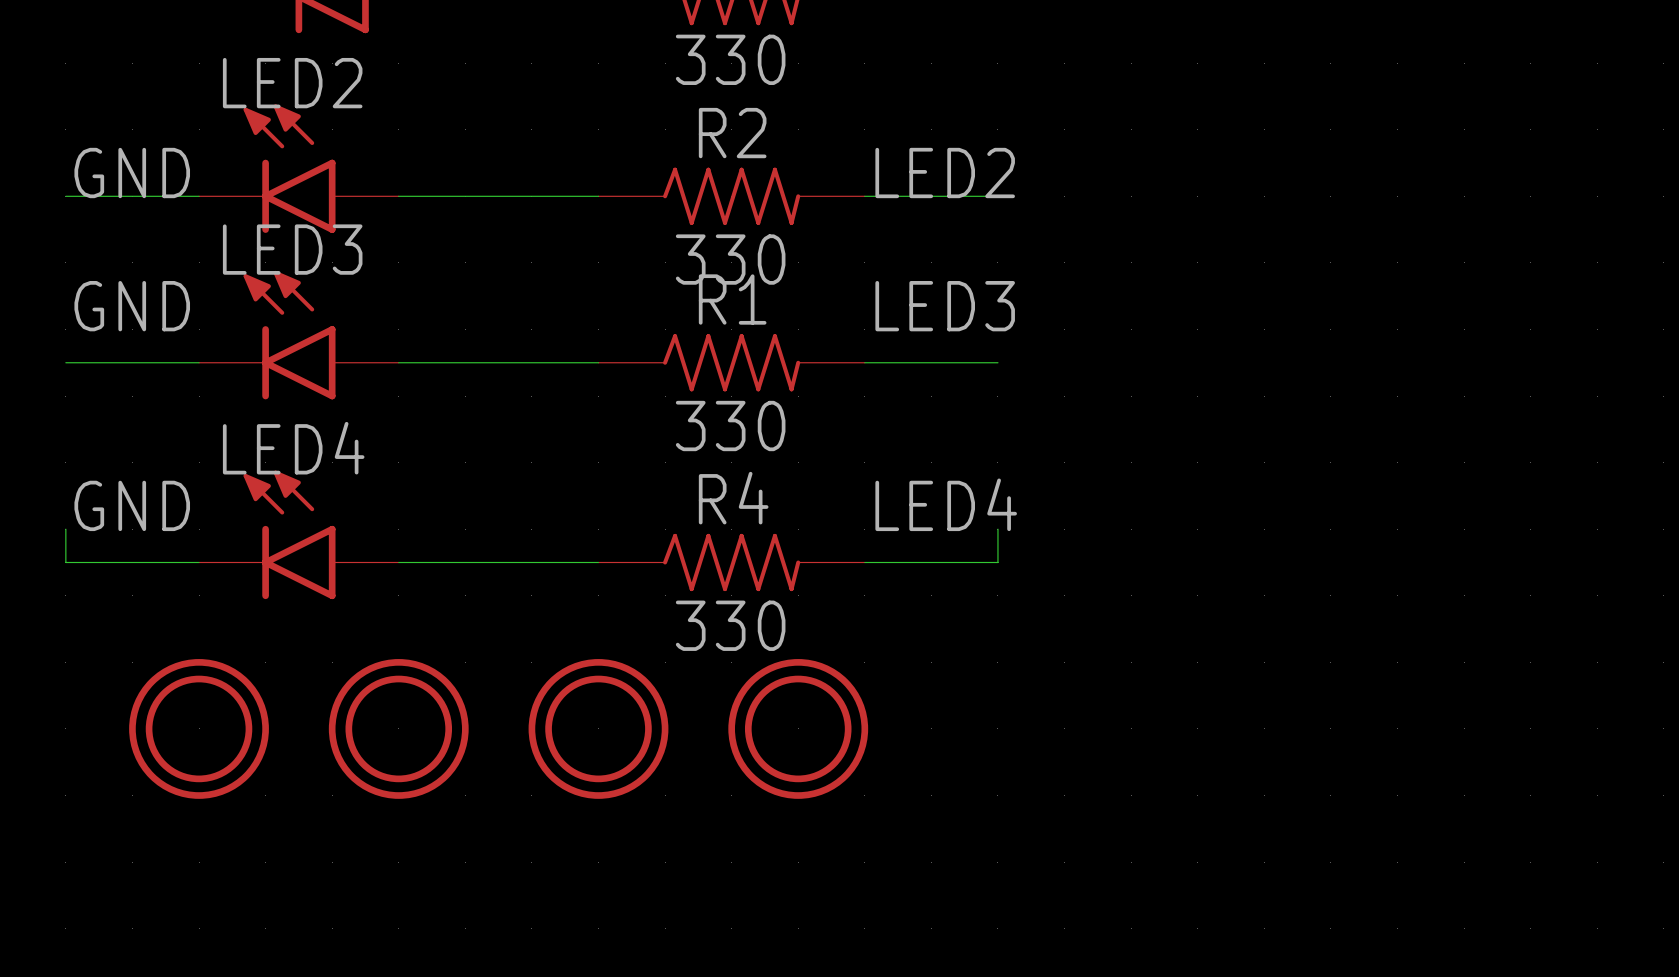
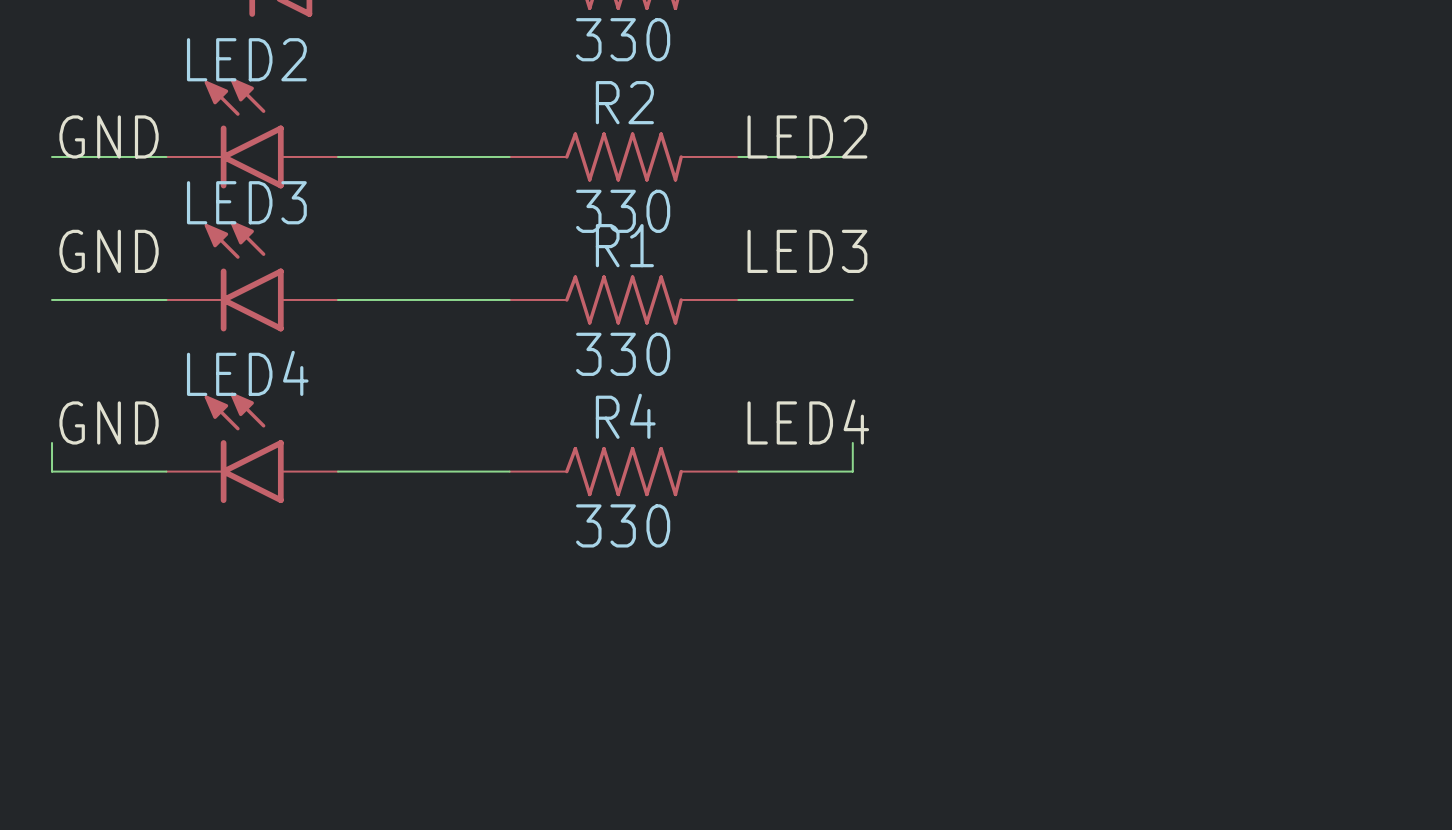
part: (199, 728) -> none
part: (398, 728) -> none
part: (598, 728) -> none
part: (798, 728) -> none

